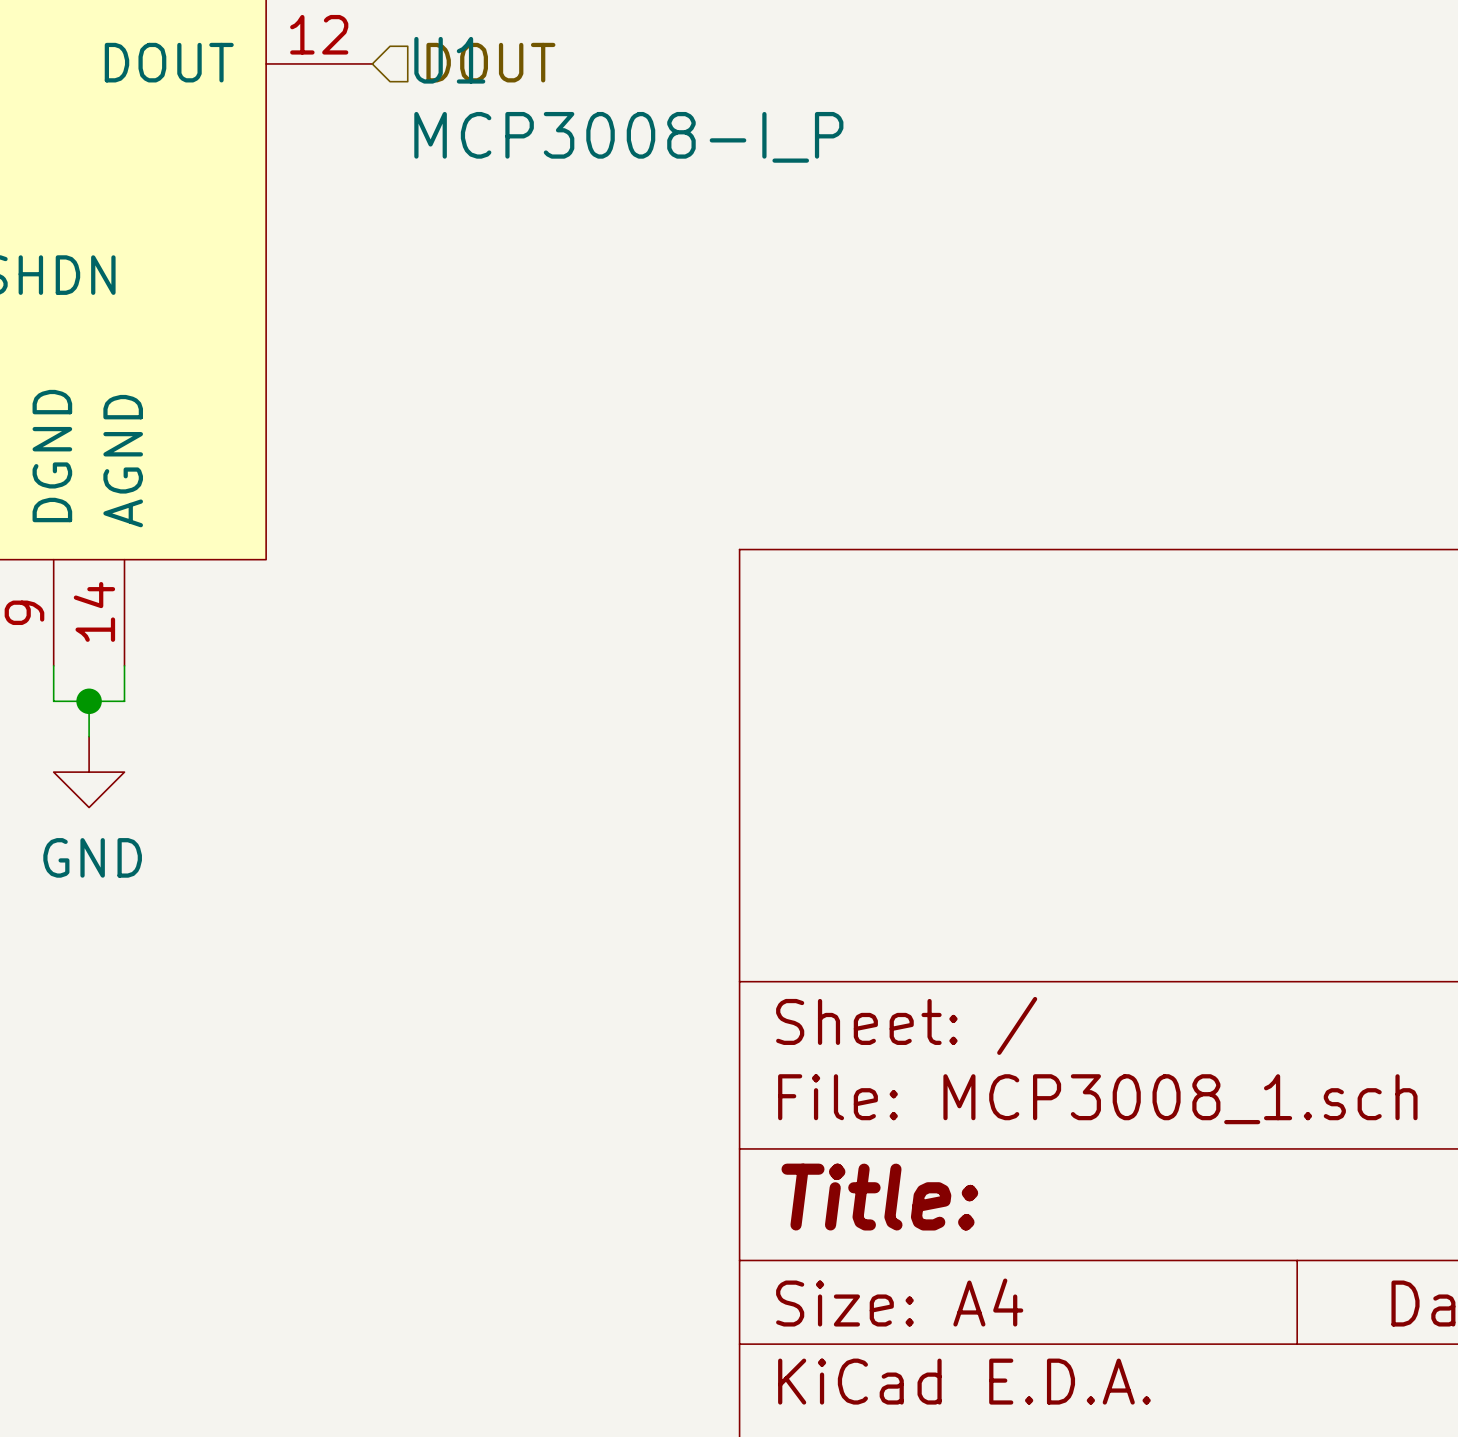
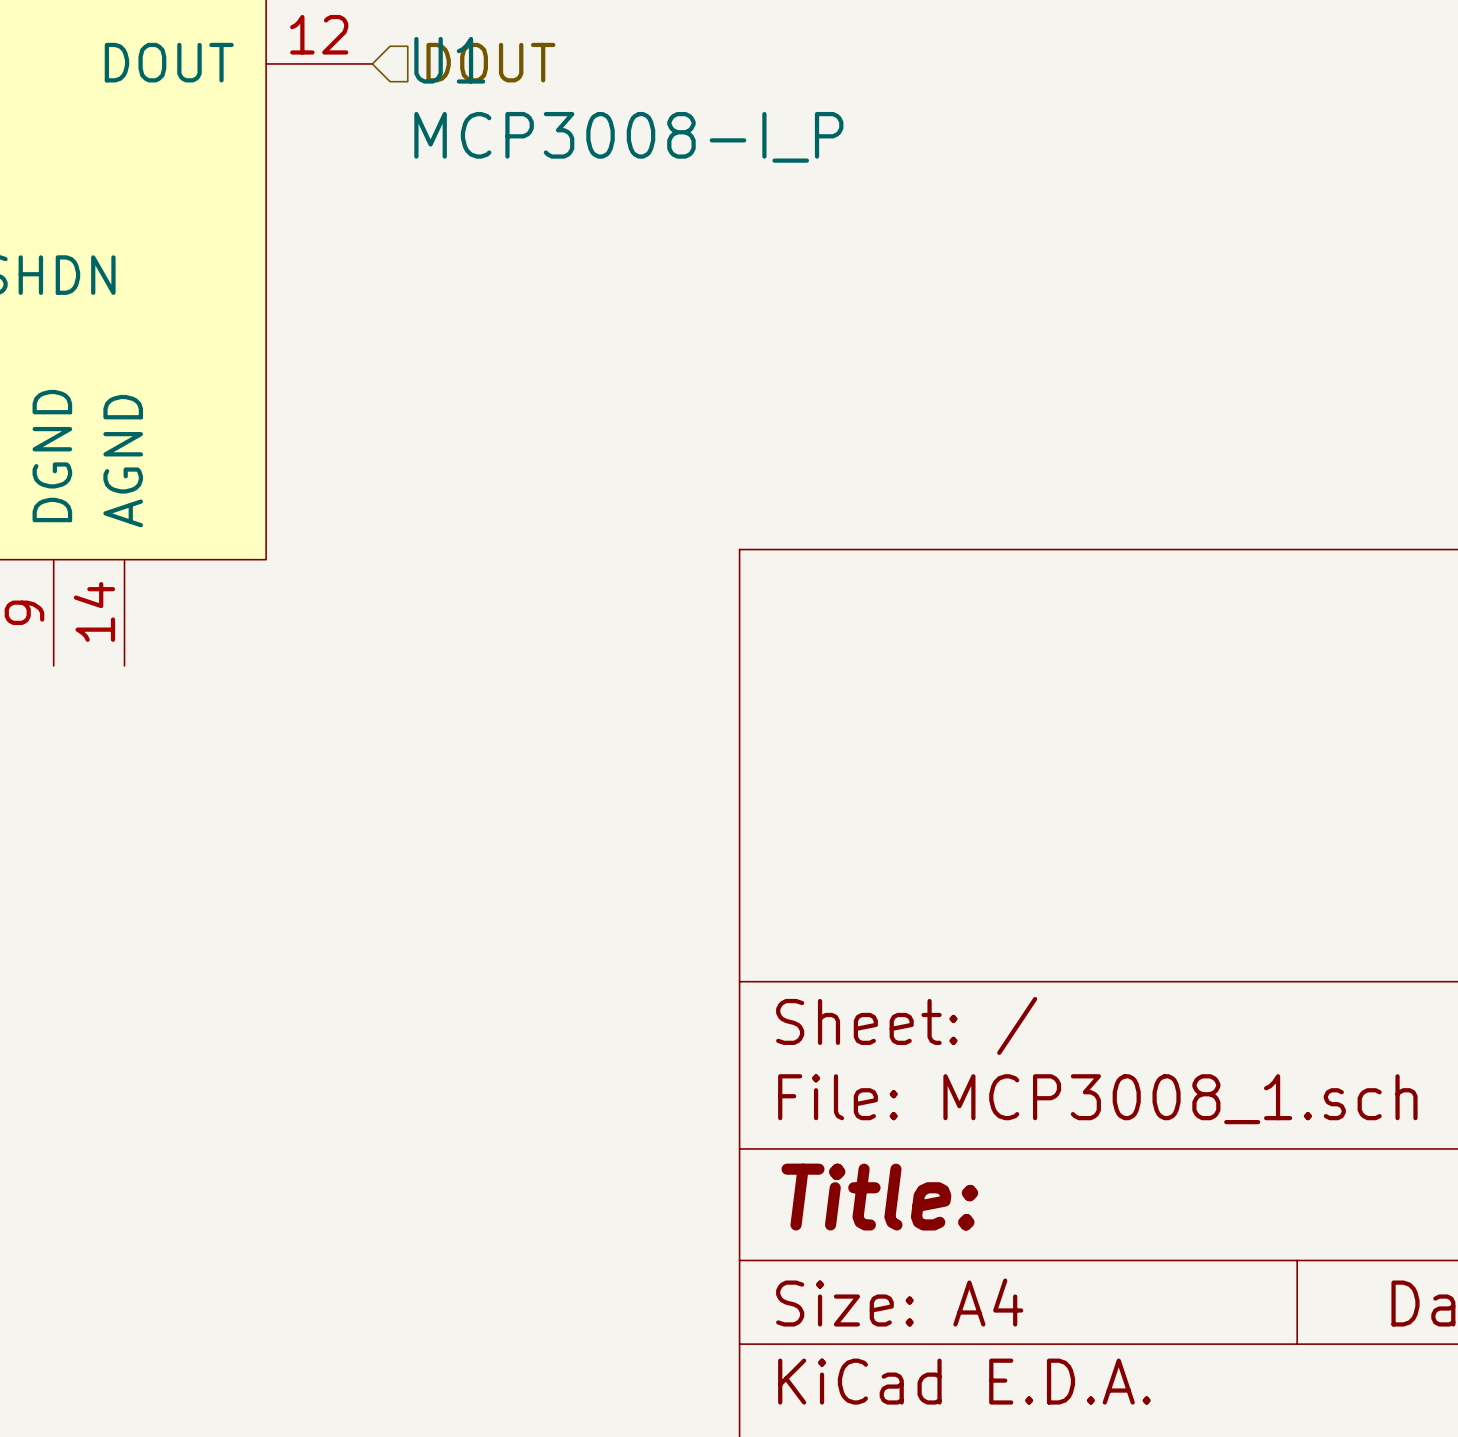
wire: (53, 665) (53, 701) (124, 701) (124, 665) -> none
wire: (89, 701) (89, 736) -> none
junction: (89, 701) -> none
power symbol: GND (89, 772) -> none

